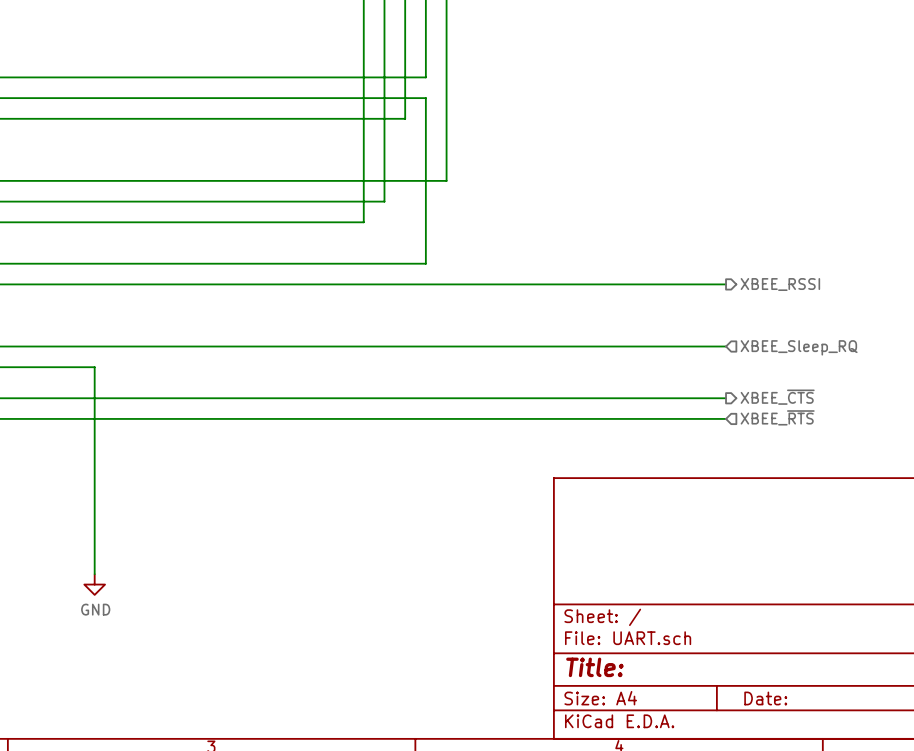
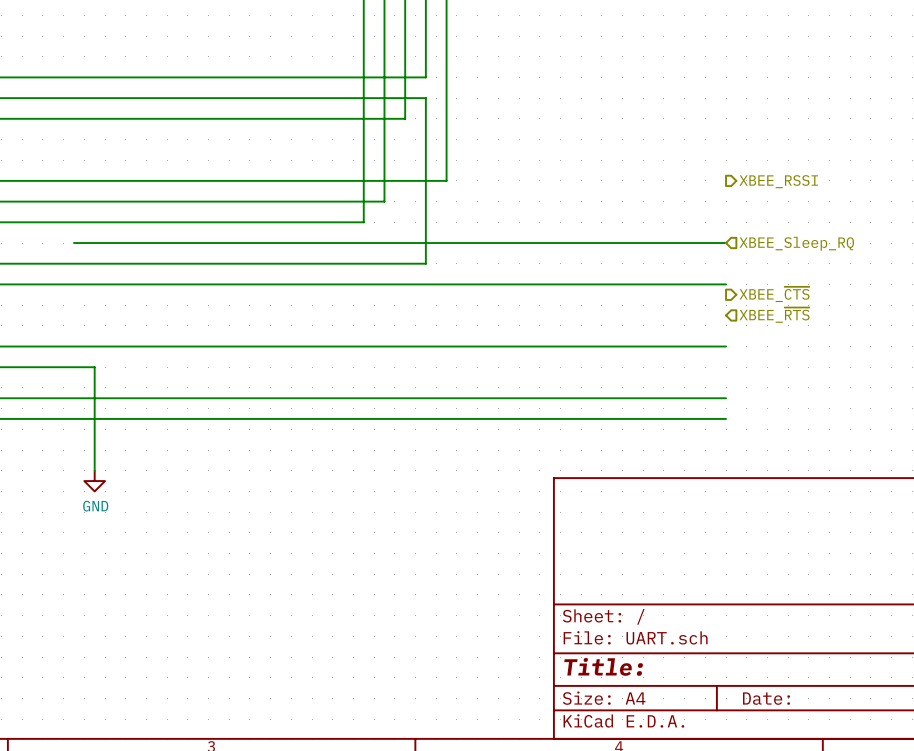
wire: none -> (73, 243) (726, 243)
hierarchical label position: XBEE_RSSI (780, 284) -> XBEE_RSSI (778, 181)
hierarchical label position: XBEE_Sleep_RQ (799, 347) -> XBEE_Sleep_RQ (796, 243)
hierarchical label position: XBEE_~{CTS} (777, 397) -> XBEE_~{CTS} (774, 294)
hierarchical label position: XBEE_~{RTS} (777, 417) -> XBEE_~{RTS} (774, 315)
wire: (94, 470) (94, 574) -> none
power symbol position: GND (94, 584) -> GND (94, 481)

